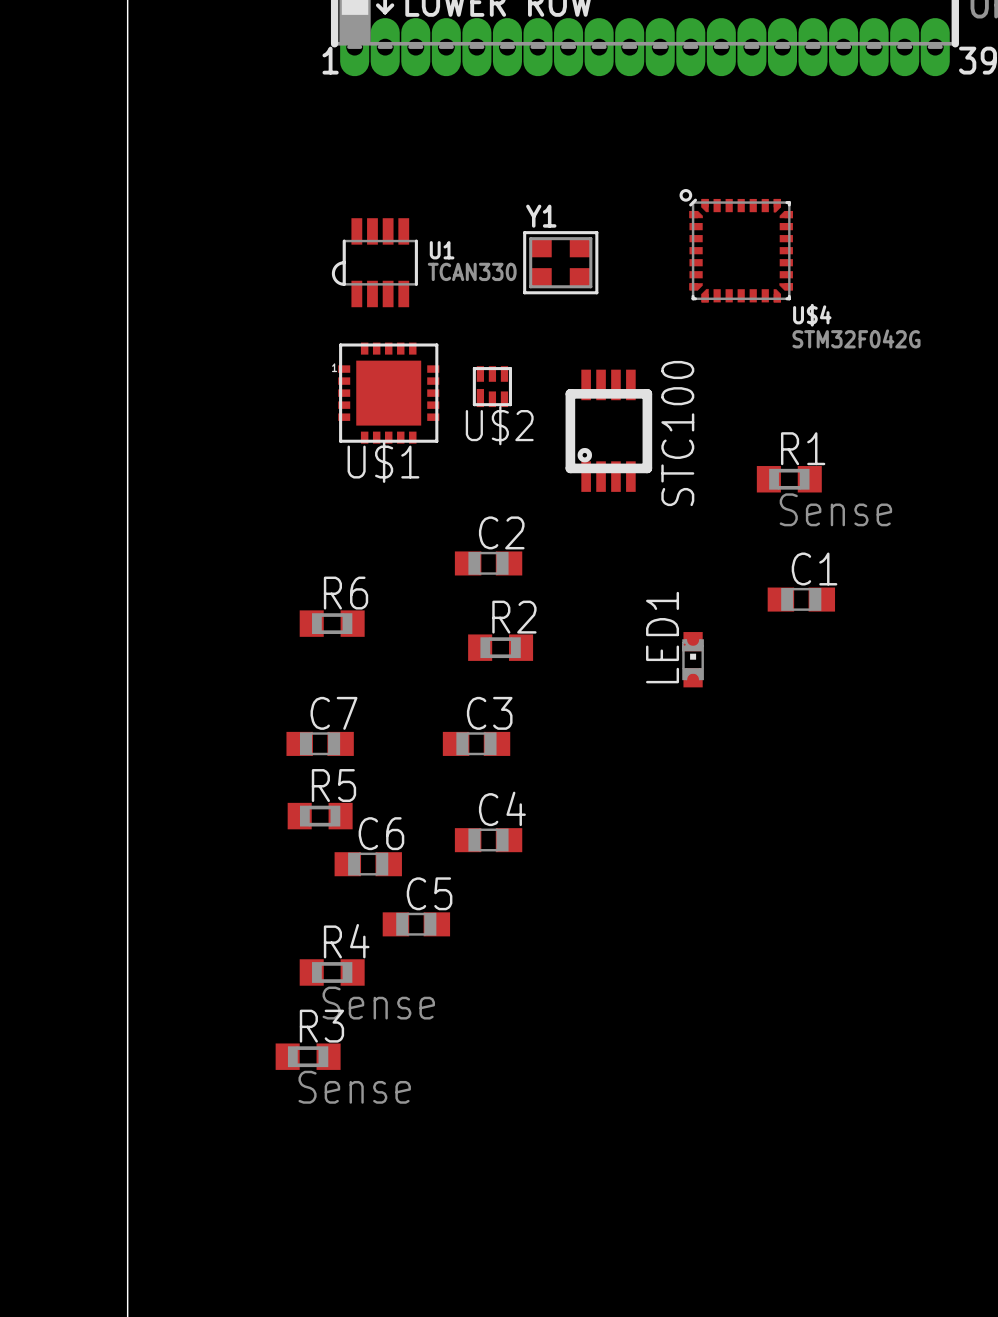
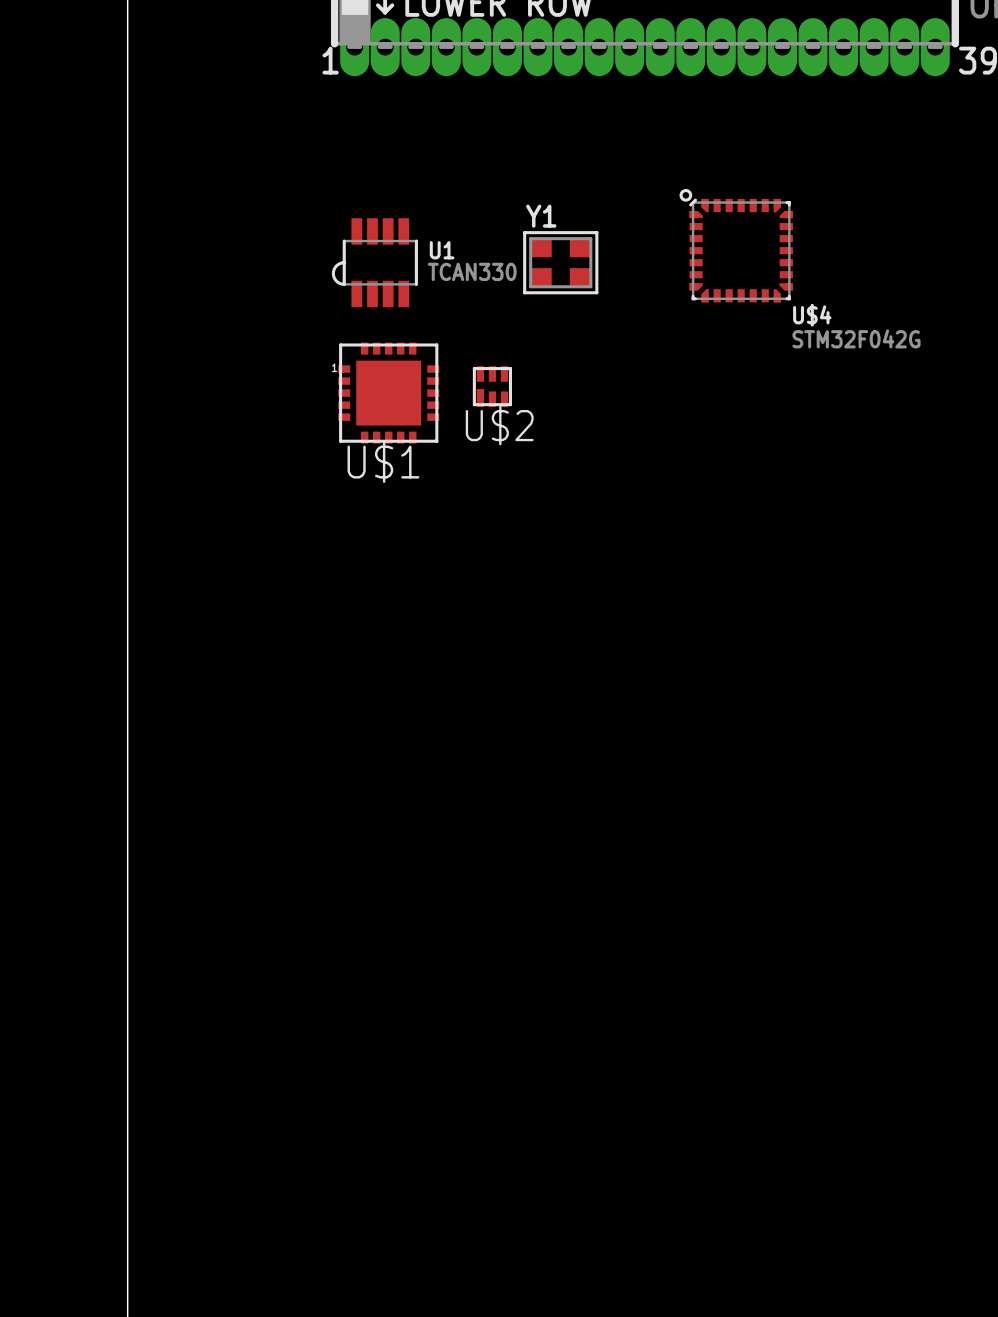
part: (608, 430) -> none
R1: Sense (789, 479) -> none
C2: (488, 563) -> none
C1: (801, 599) -> none
R6: (332, 623) -> none
R2: (500, 647) -> none
LED1: (693, 659) -> none
C7: (320, 743) -> none
C3: (476, 743) -> none
R5: (320, 816) -> none
C4: (488, 840) -> none
C6: (368, 864) -> none
C5: (416, 924) -> none
R4: Sense (332, 972) -> none
R3: Sense (308, 1056) -> none

